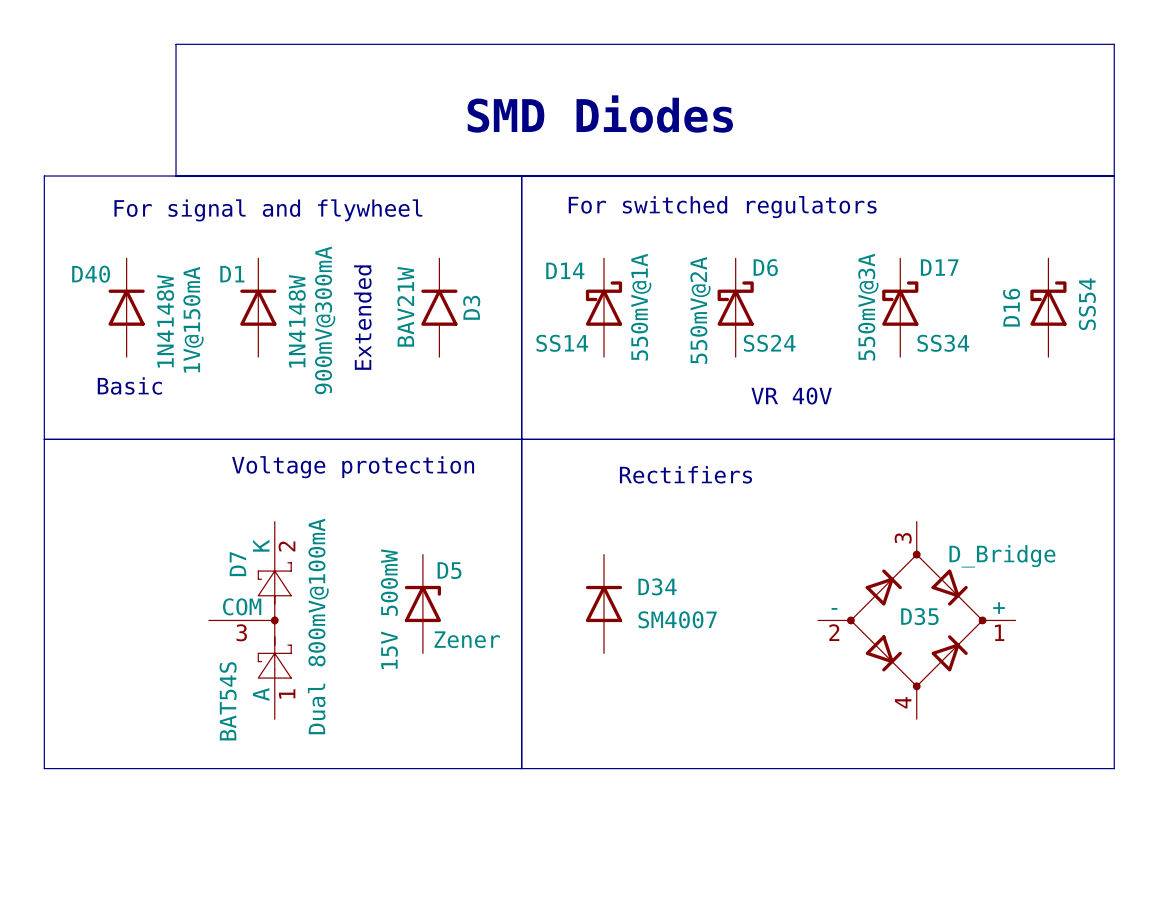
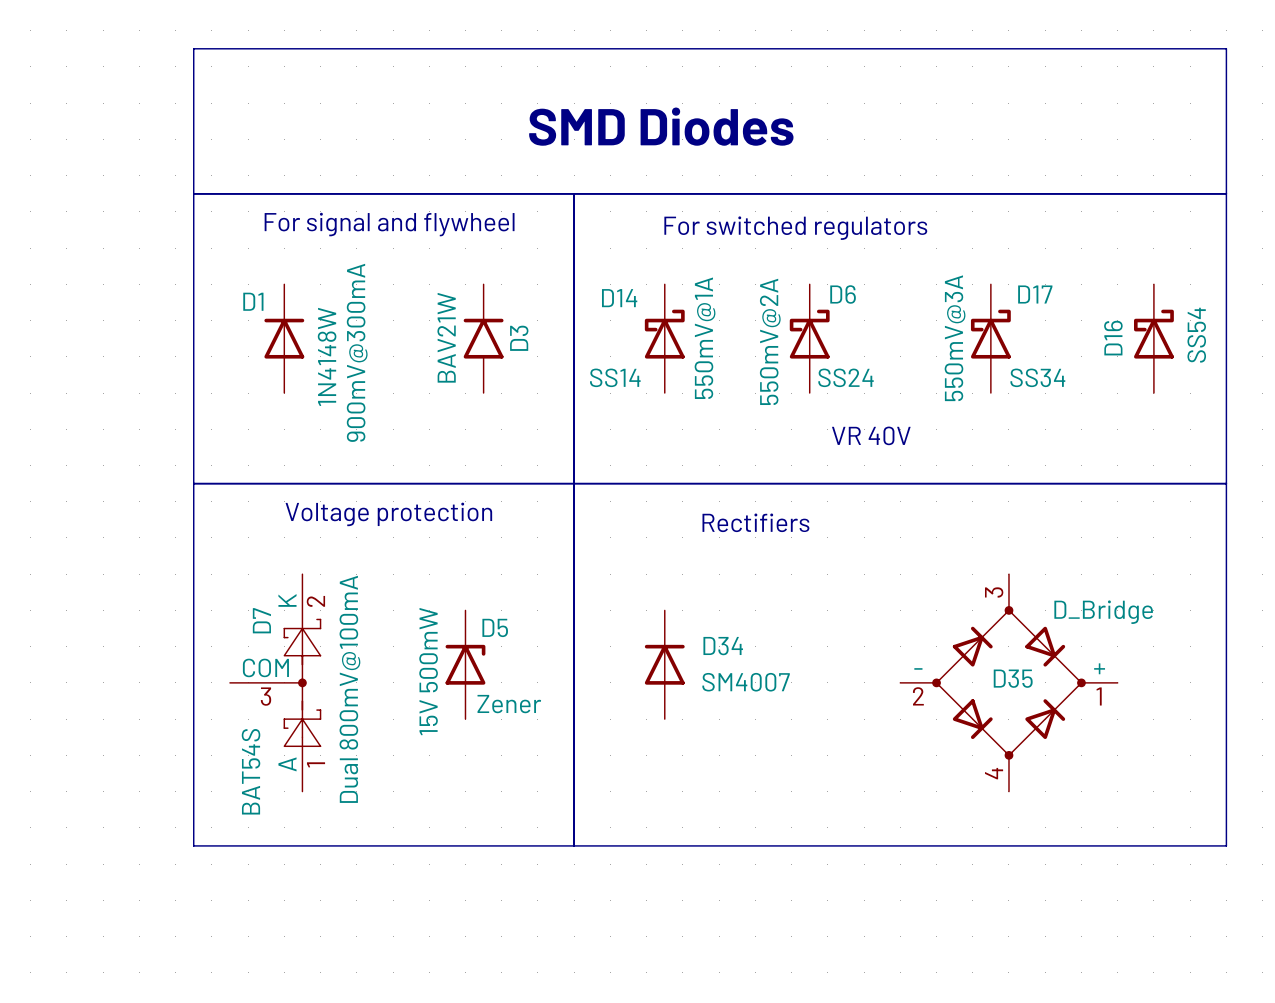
line: (176, 176) (44, 176) (44, 768) (176, 768) -> (193, 193) (193, 845)
text position: For signal and flywheel (268, 210) -> For signal and flywheel (389, 224)
D40: 1N4148W (126, 307) -> none
text: Extended (362, 317) -> none
text: Basic (129, 385) -> none
line: (44, 439) (176, 439) -> none

